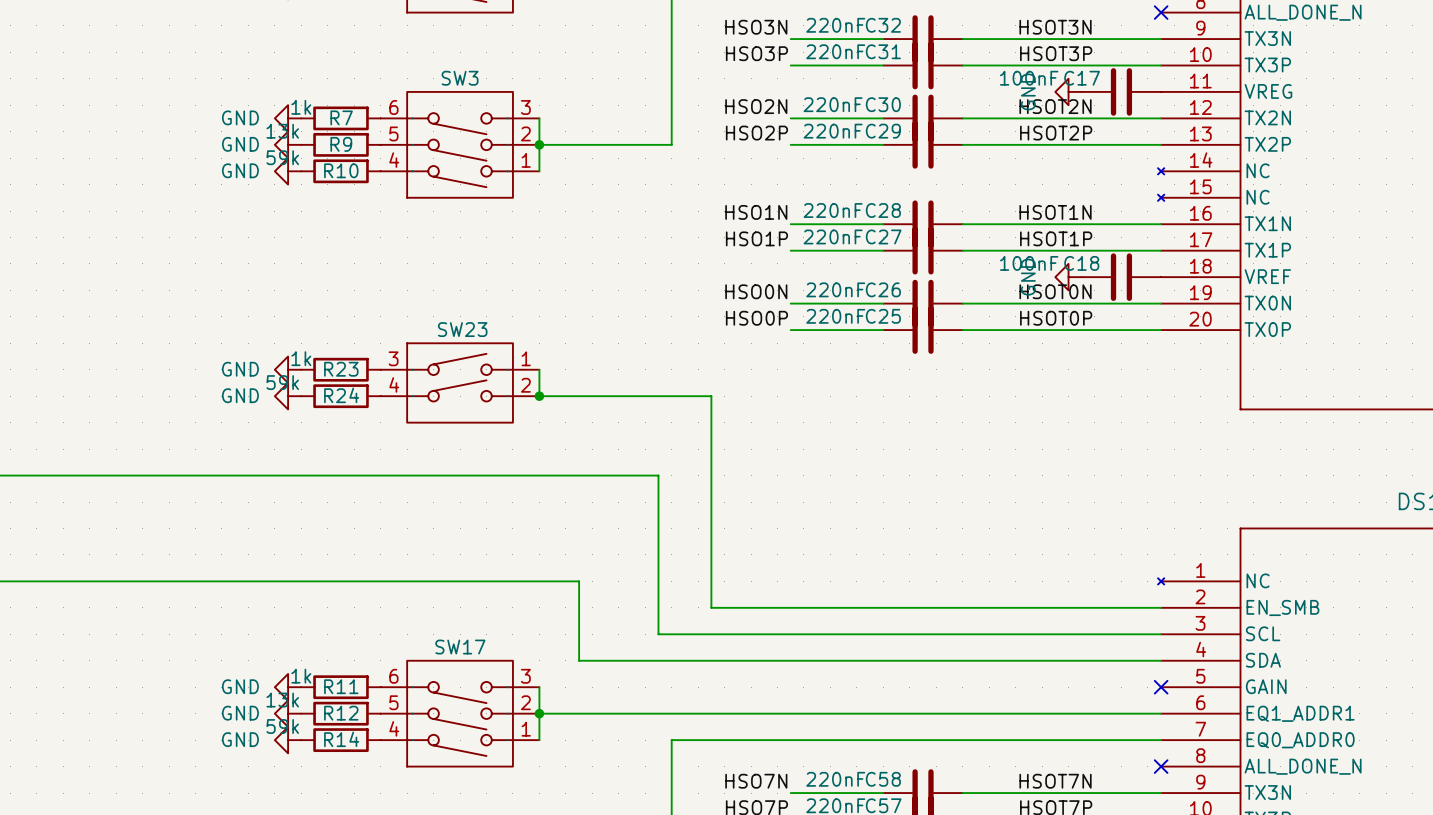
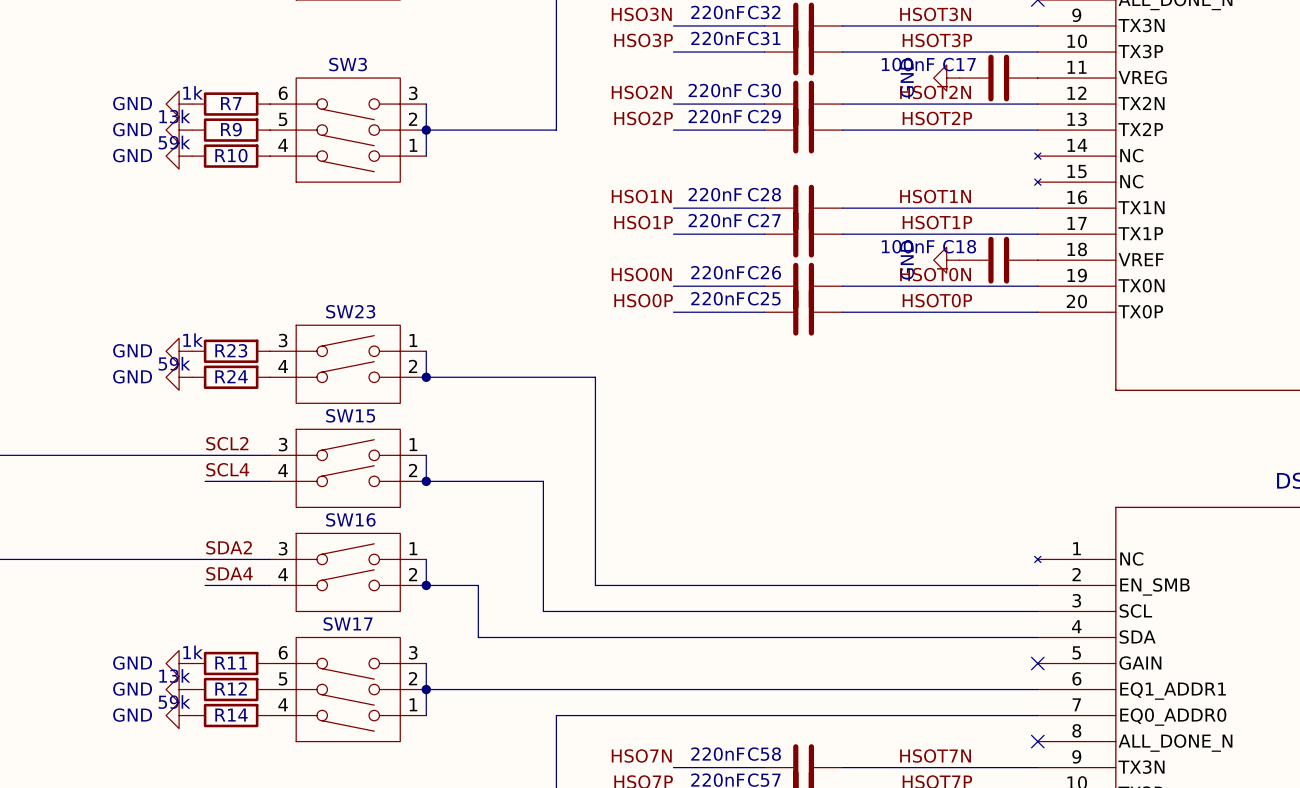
label: none -> SCL2 (227, 443)
wire: (380, 475) (658, 475) (658, 502) -> (426, 455) (426, 481) (543, 481)
SW15: none -> (348, 468)
label: none -> SCL4 (227, 469)
wire: none -> (205, 481) (270, 481)
junction: none -> (426, 481)
label: none -> SDA2 (229, 547)
wire: (380, 581) (579, 581) (579, 660) (592, 660) -> (426, 559) (426, 585) (478, 585) (478, 637)
SW16: none -> (348, 572)
label: none -> SDA4 (229, 573)
wire: none -> (205, 585) (270, 585)
junction: none -> (426, 585)

